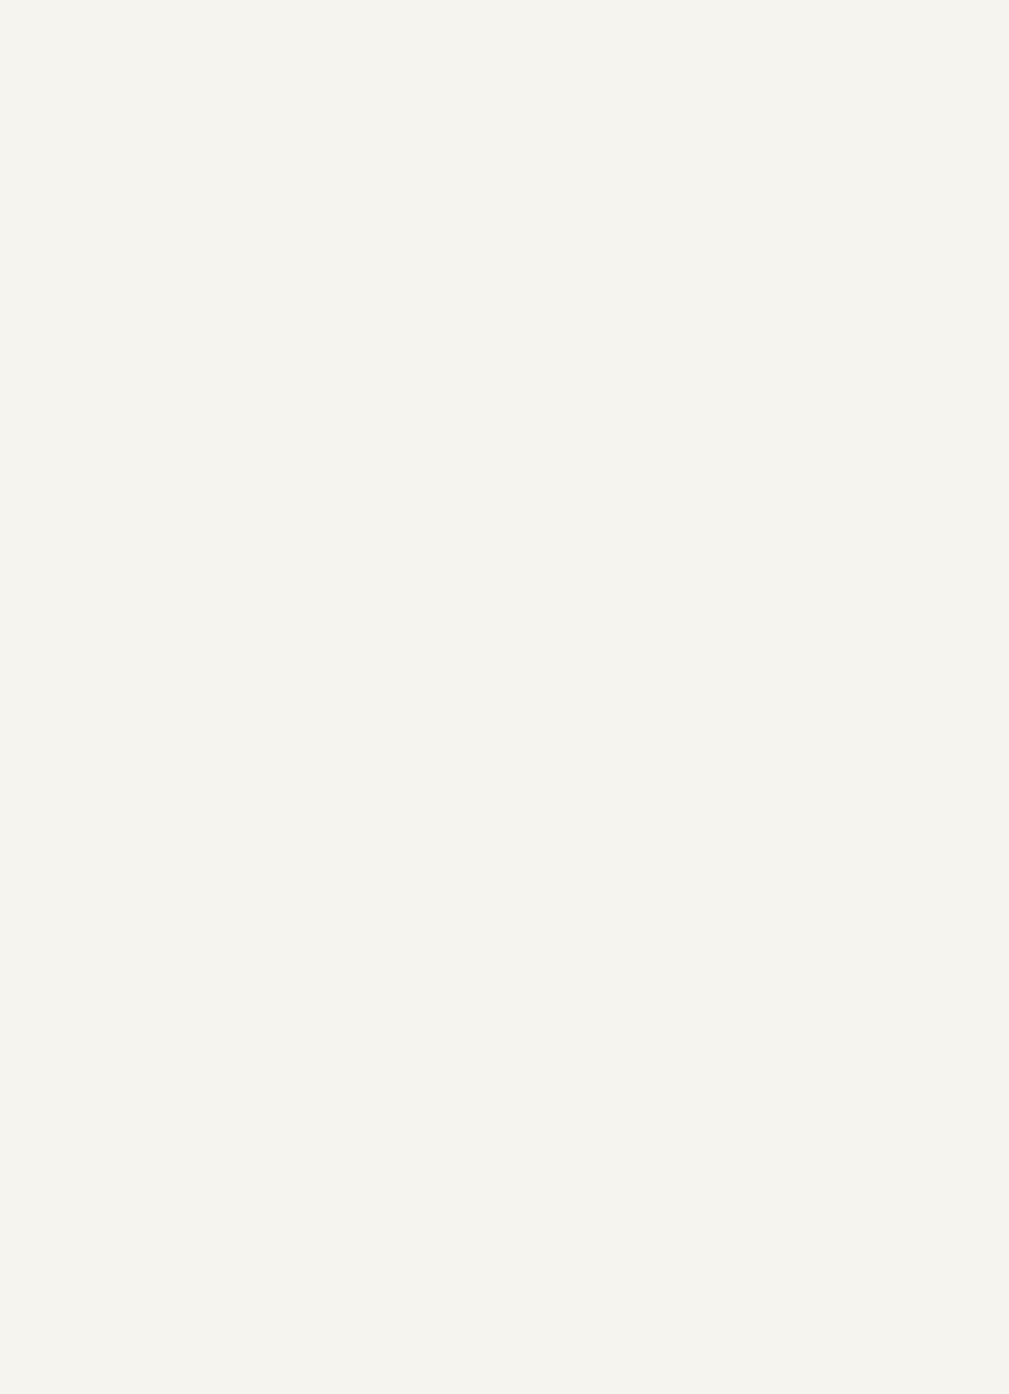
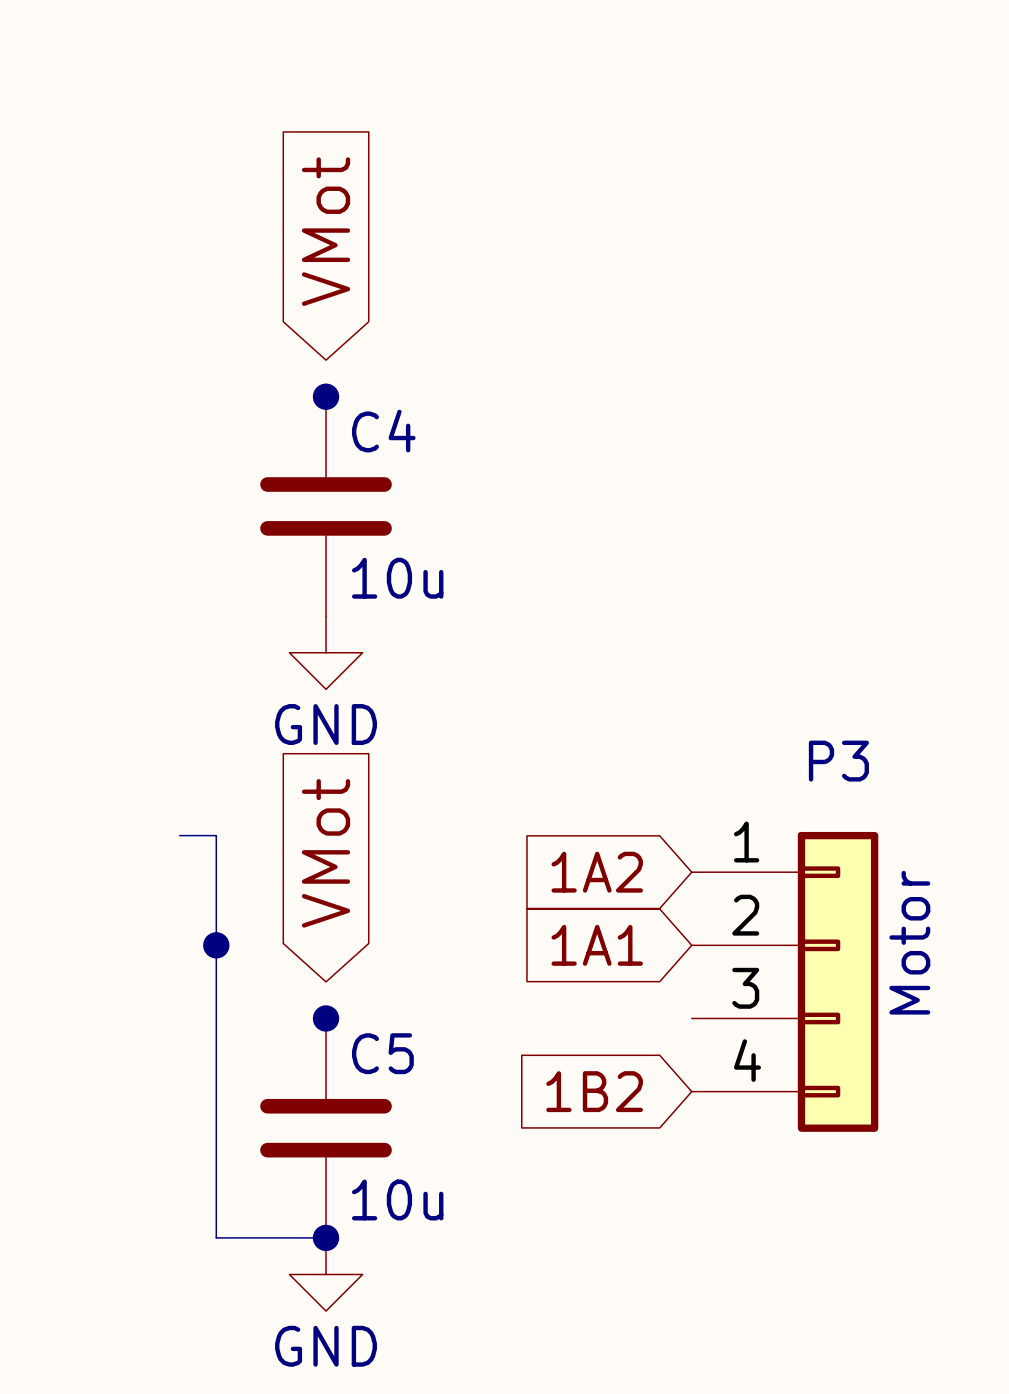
global label: none -> VMot (326, 231)
junction: none -> (326, 396)
C4: none -> 10u (326, 506)
power symbol: none -> GND (326, 652)
wire: none -> (179, 835) (216, 835) (216, 1237) (326, 1237)
global label: none -> VMot (326, 853)
global label: none -> 1A2 (597, 872)
junction: none -> (216, 945)
global label: none -> 1A1 (597, 945)
P3: none -> Motor (785, 981)
junction: none -> (326, 1018)
global label: none -> 1B2 (594, 1091)
C5: none -> 10u (326, 1128)
junction: none -> (326, 1237)
power symbol: none -> GND (326, 1274)

